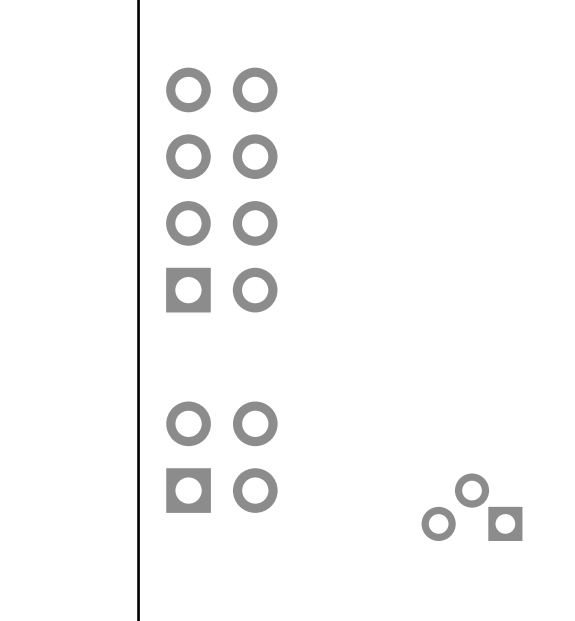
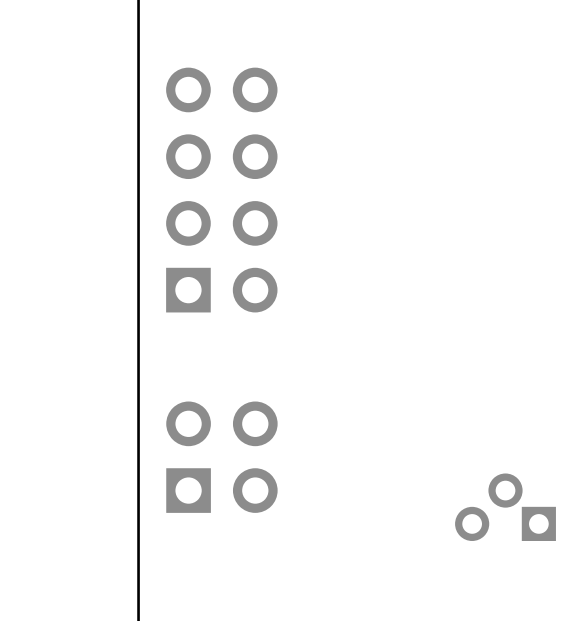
part position: (472, 507) -> (505, 507)

